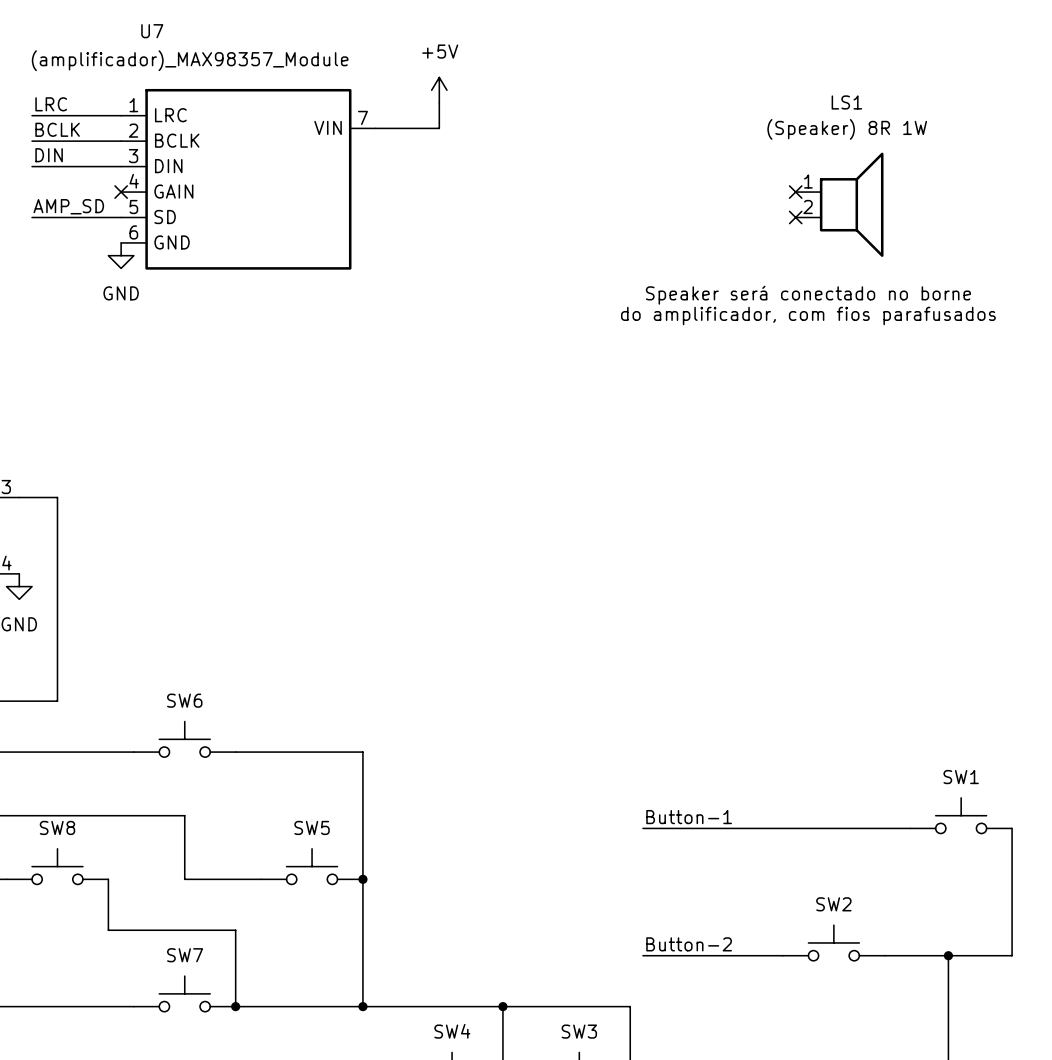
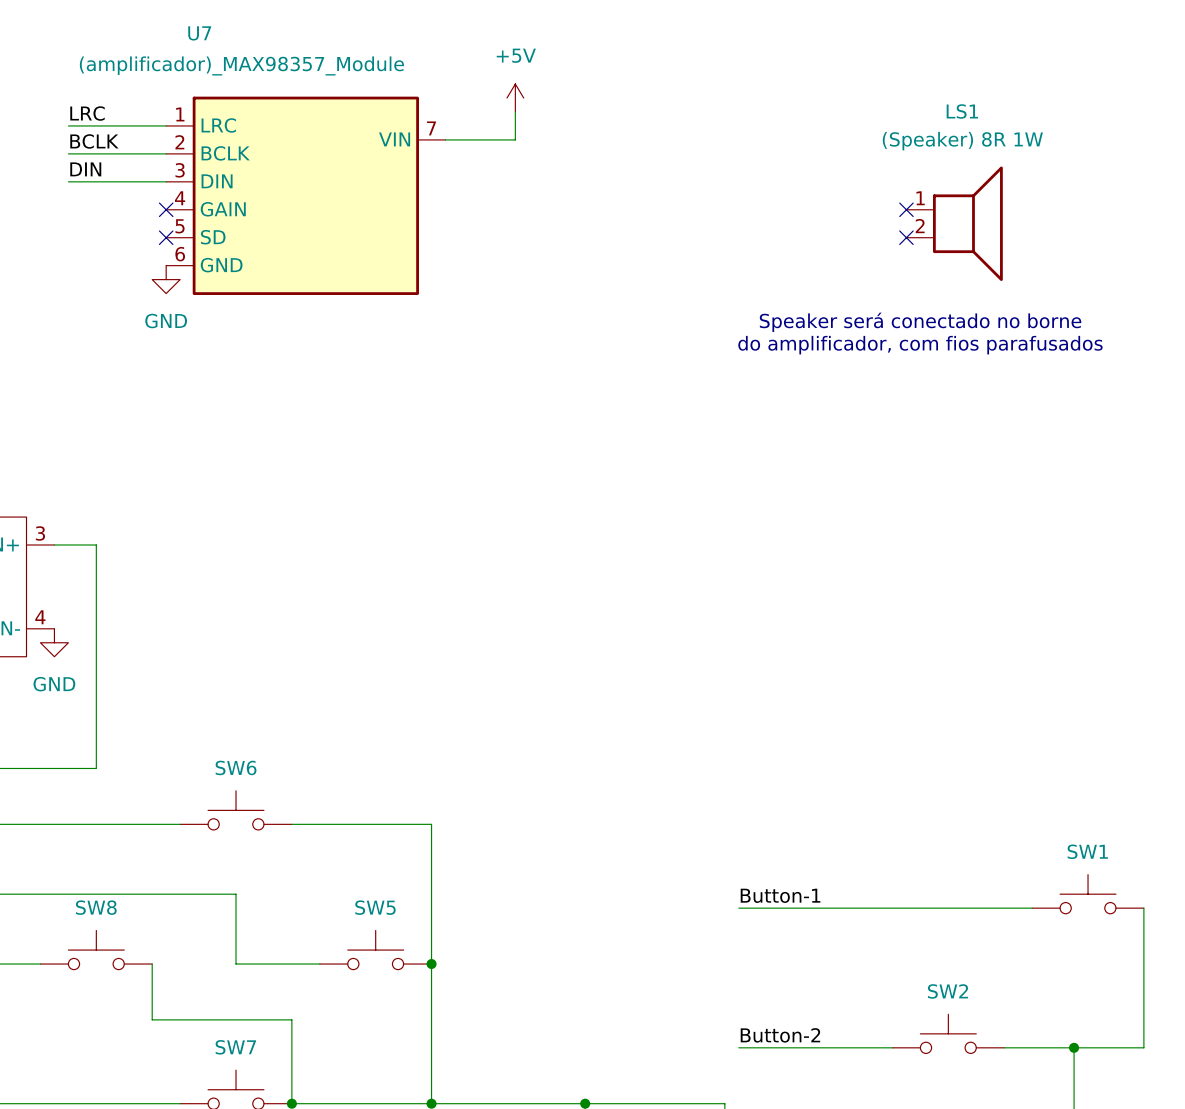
label: AMP_SD (68, 206) -> none
wire: (32, 217) (121, 217) -> none
no-connect mark: none -> (166, 237)

